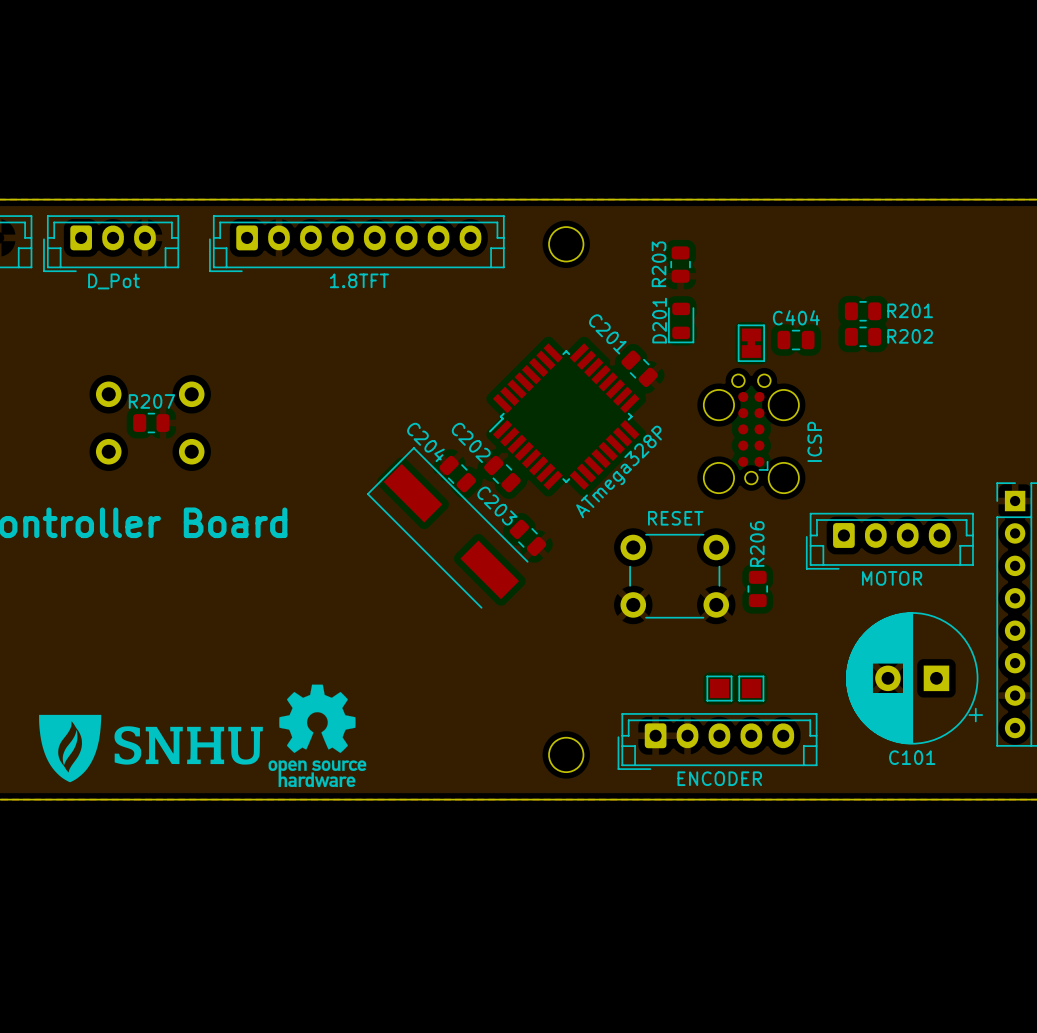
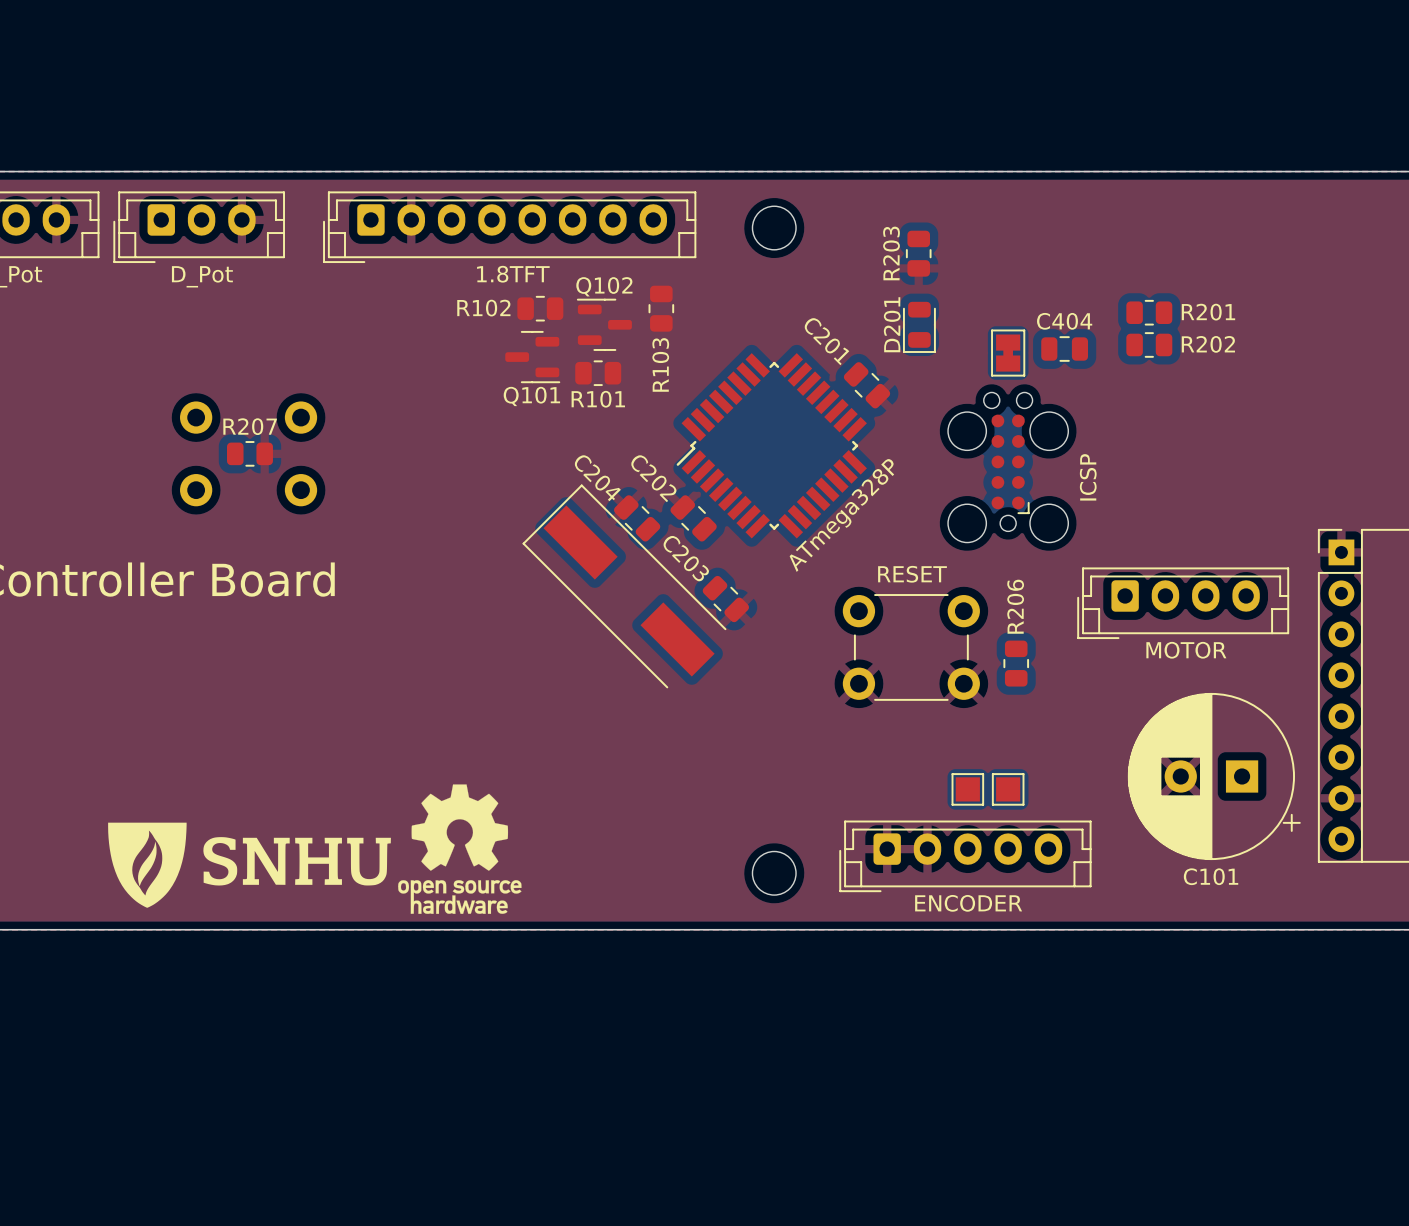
R102: none -> (540, 308)
R103: none -> (661, 308)
Q102: none -> (604, 324)
Q101: none -> (532, 357)
R101: none -> (598, 373)

